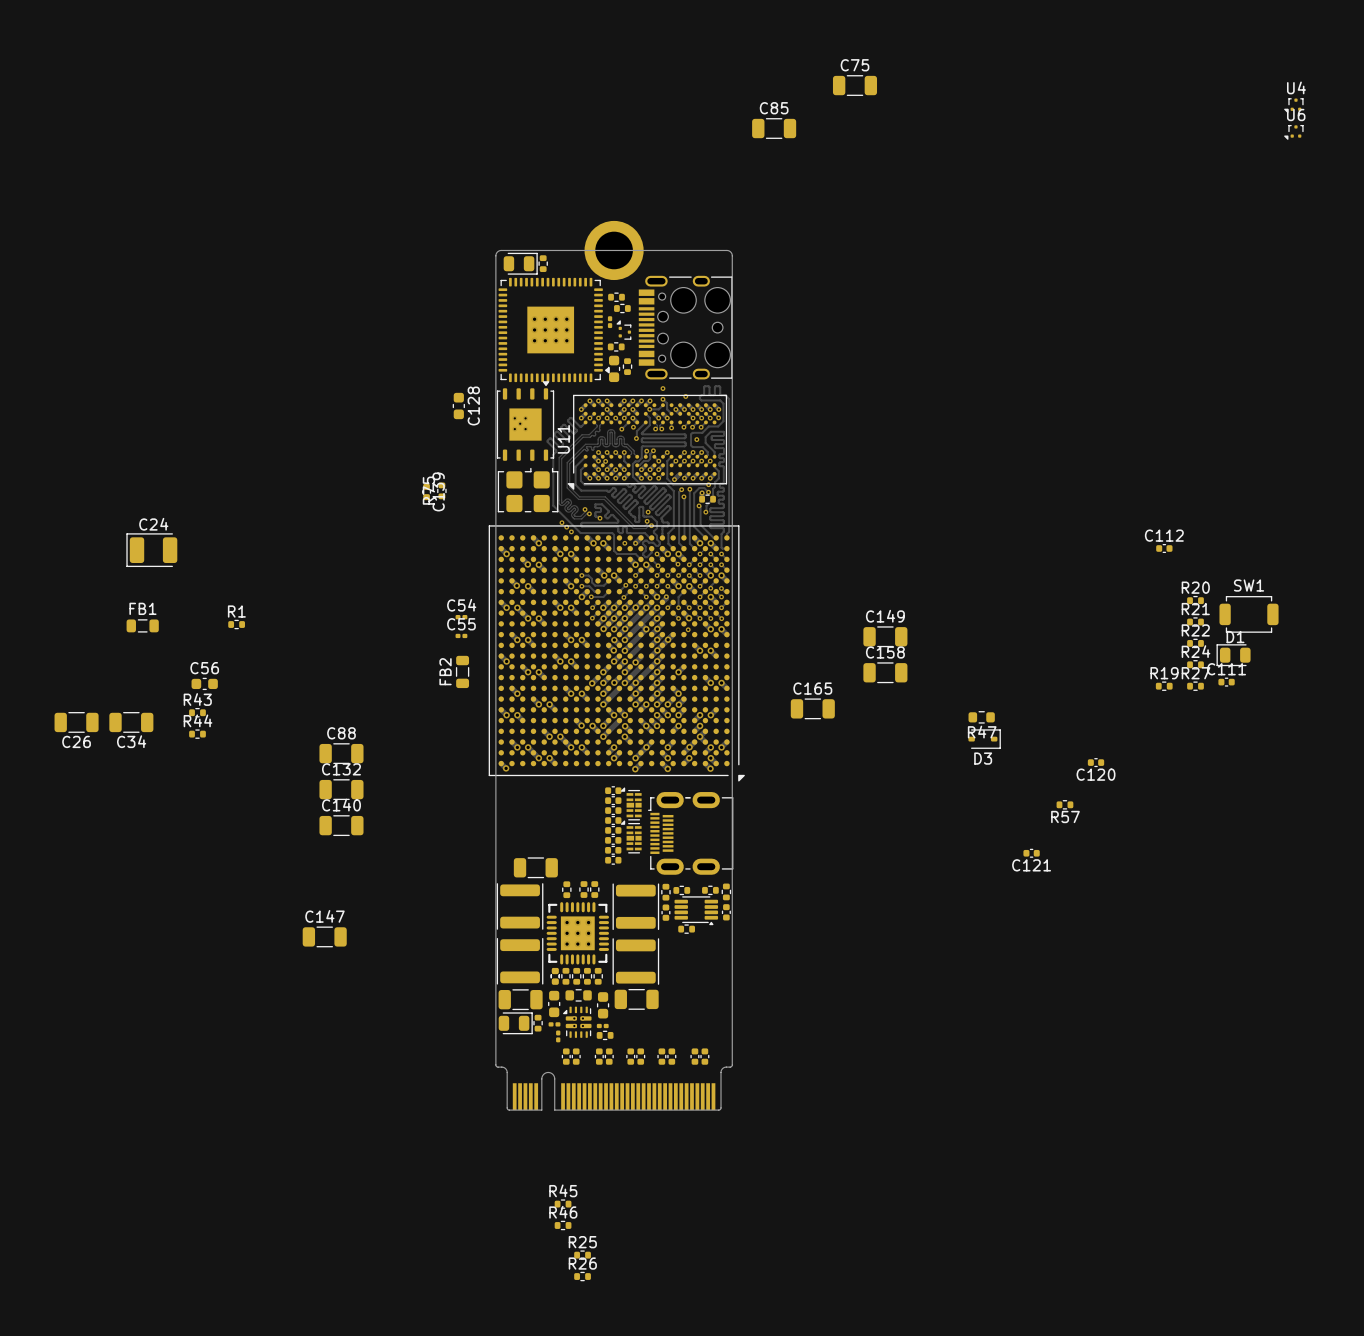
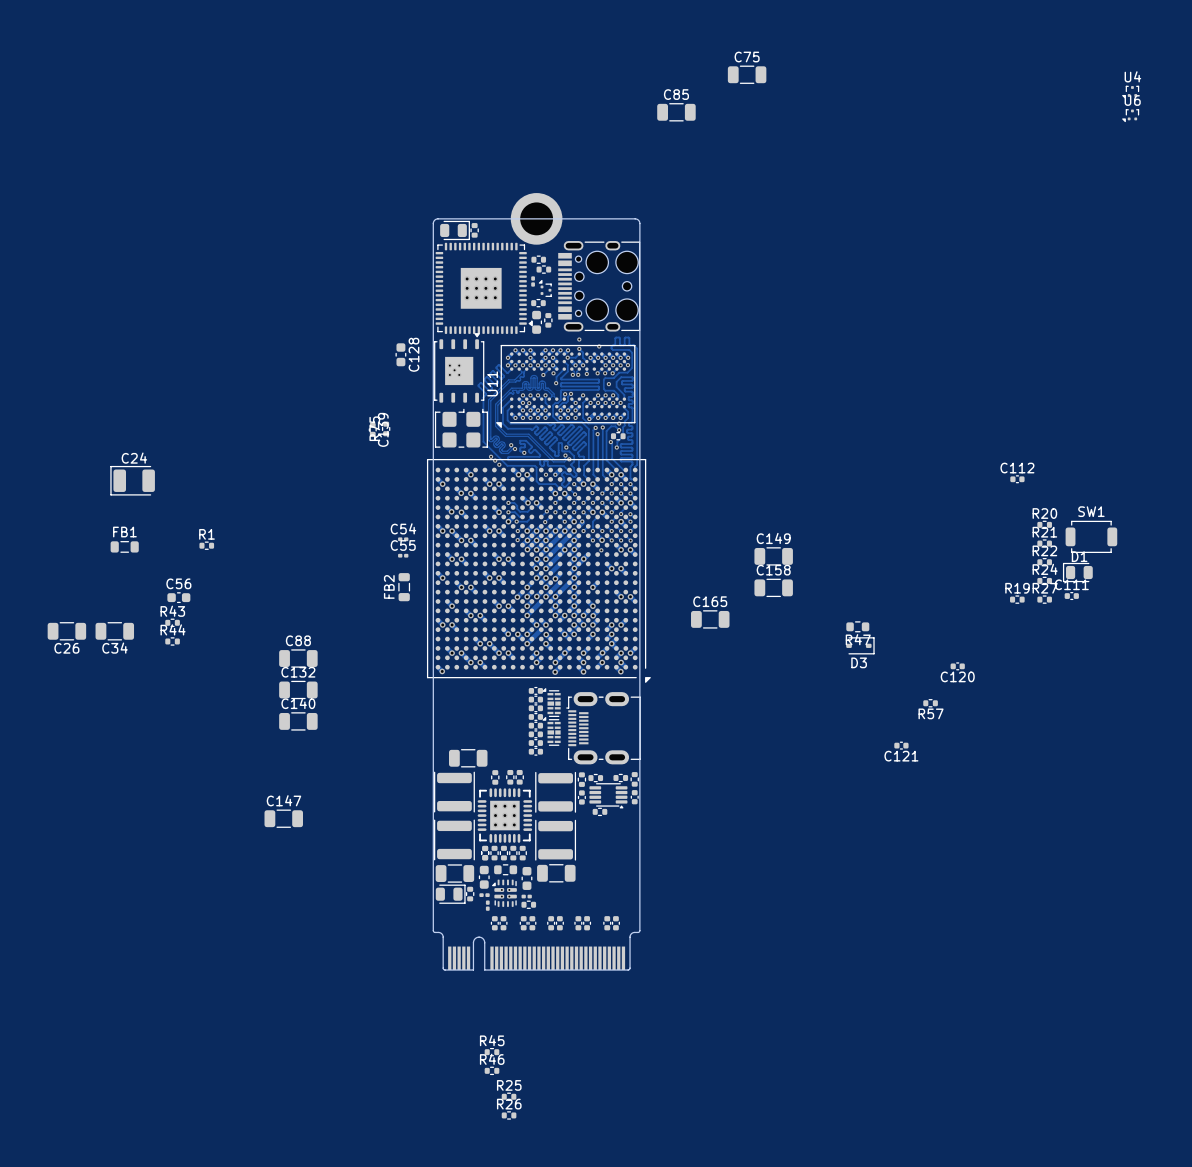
via: (702, 492) -> none

